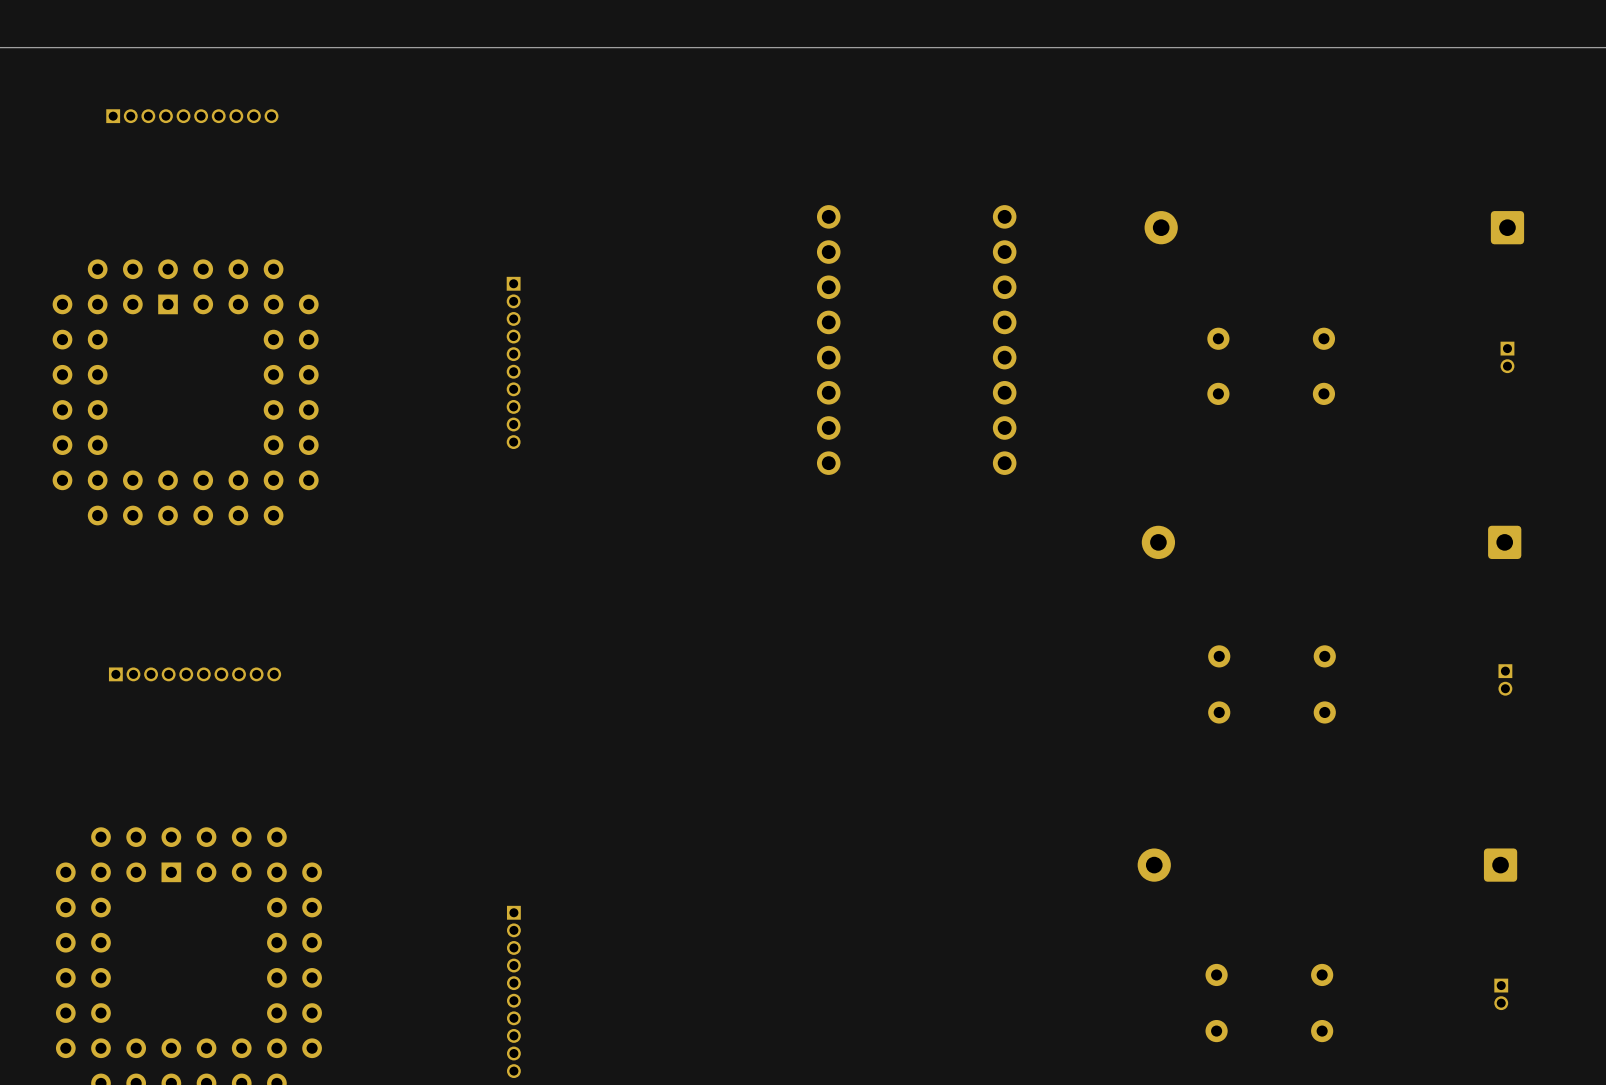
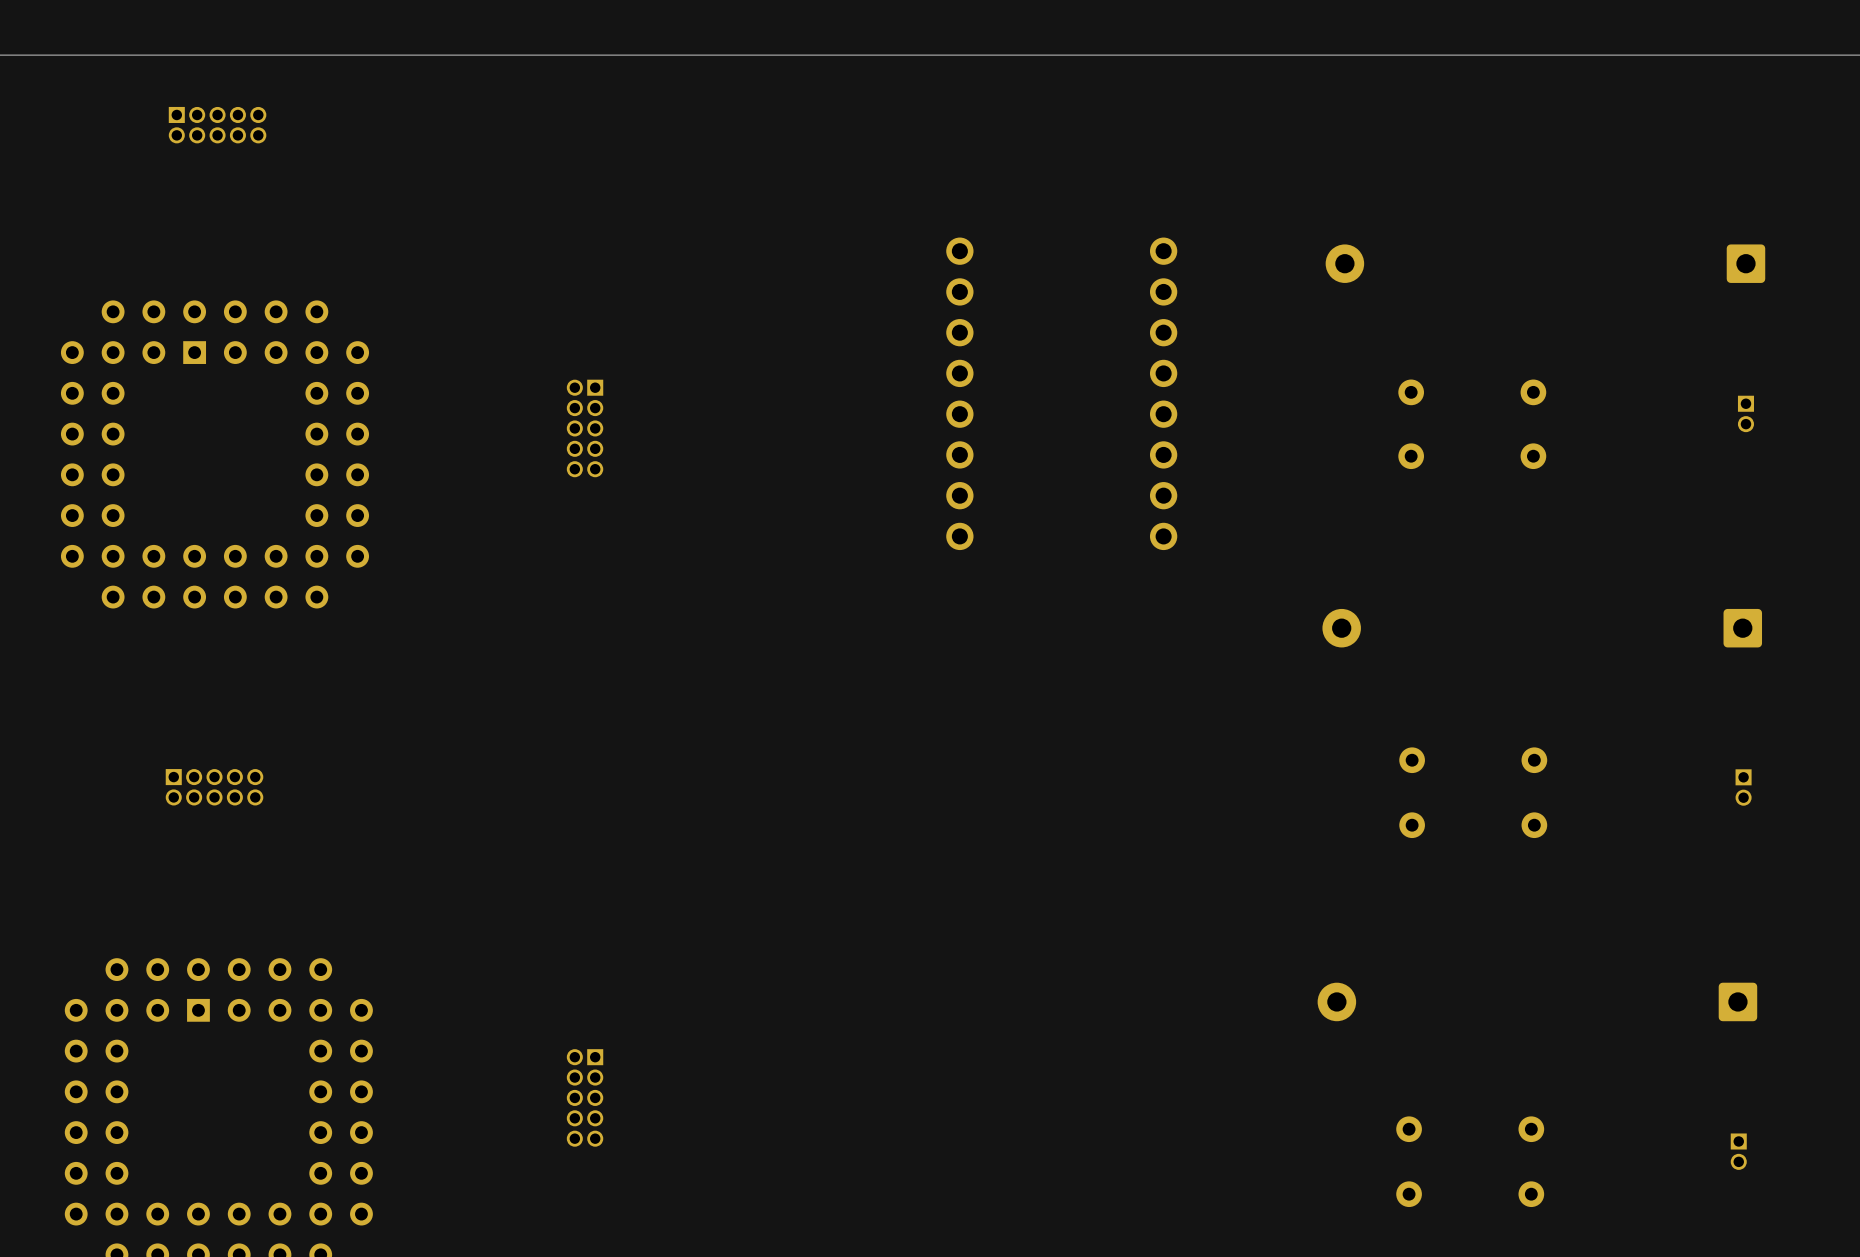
part footprint: [106, 109, 279, 124] -> [168, 106, 267, 144]
part footprint: [506, 276, 521, 450] -> [566, 379, 604, 478]
part footprint: [108, 667, 282, 682] -> [165, 769, 264, 806]
part: none -> (585, 1097)
part: (513, 991) -> none

